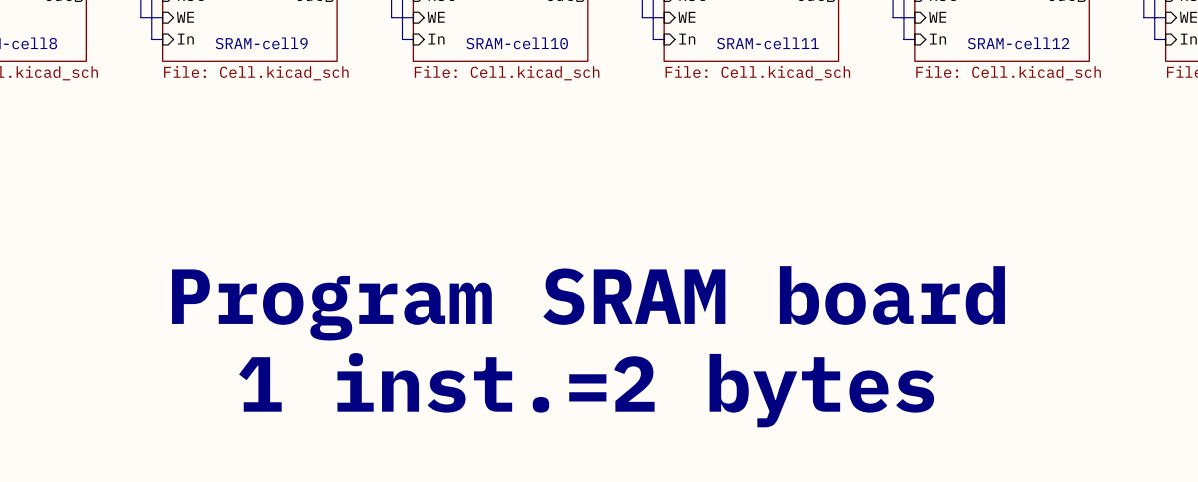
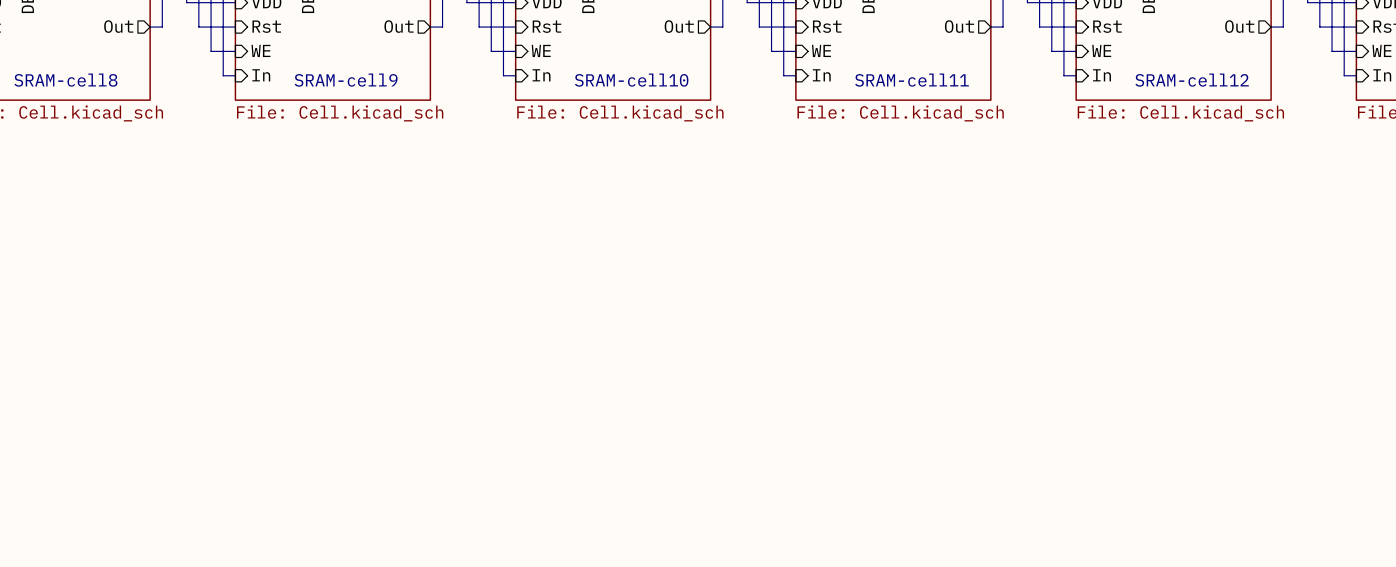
text: Program SRAM board (588, 303) -> none
text: 1 inst.=2 bytes (586, 390) -> none

